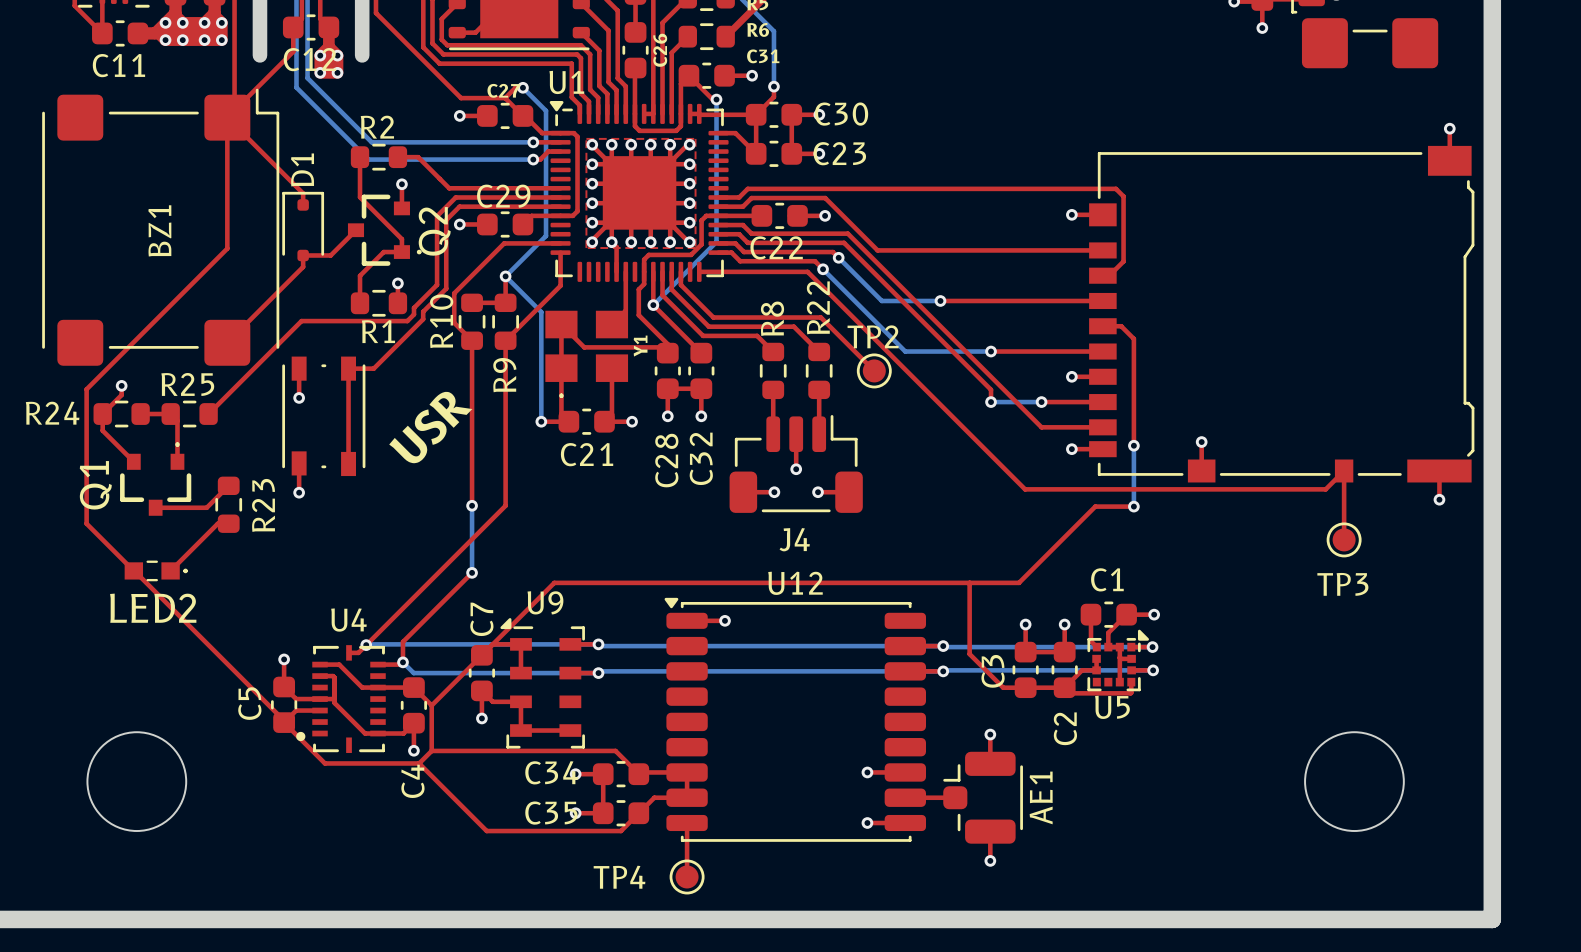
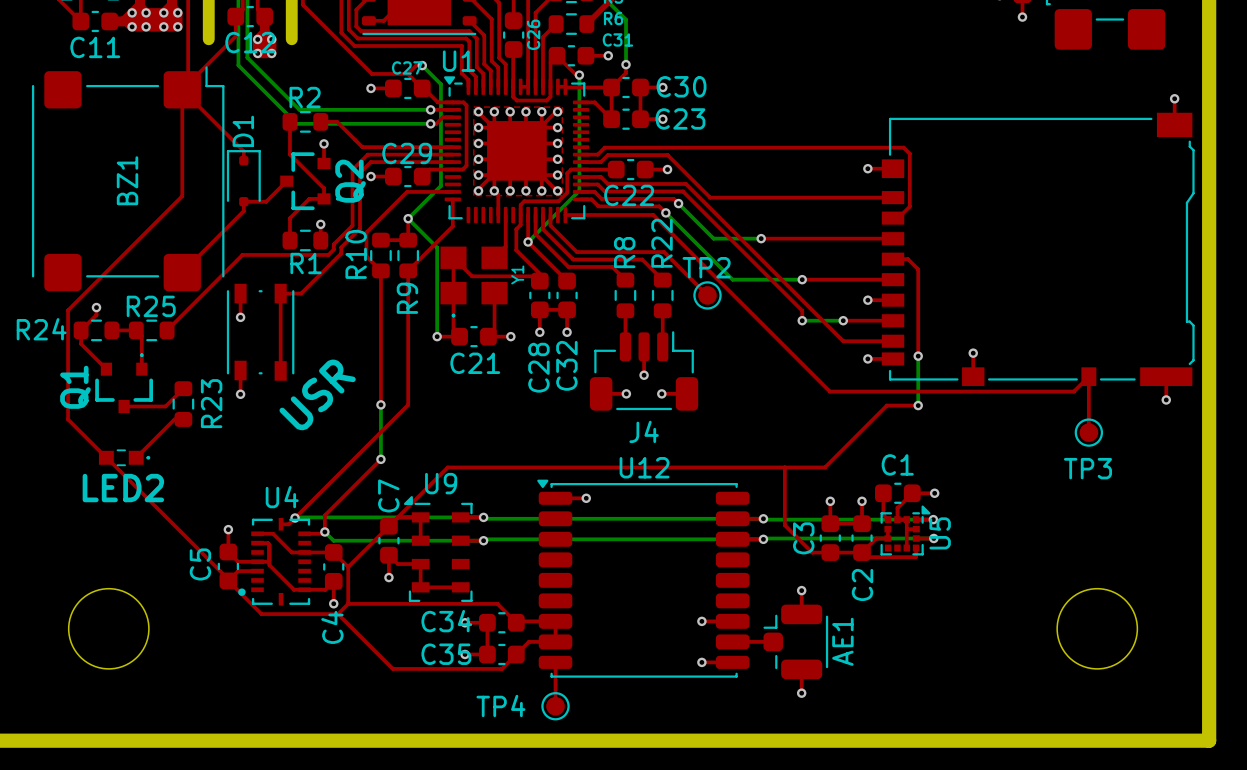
text position: USR (430, 427) -> USR (317, 394)
U5 name rotation: 0° (1112, 707) -> 90° counterclockwise (940, 533)
U5 name position: U5 (1112, 707) -> U5 (940, 533)

